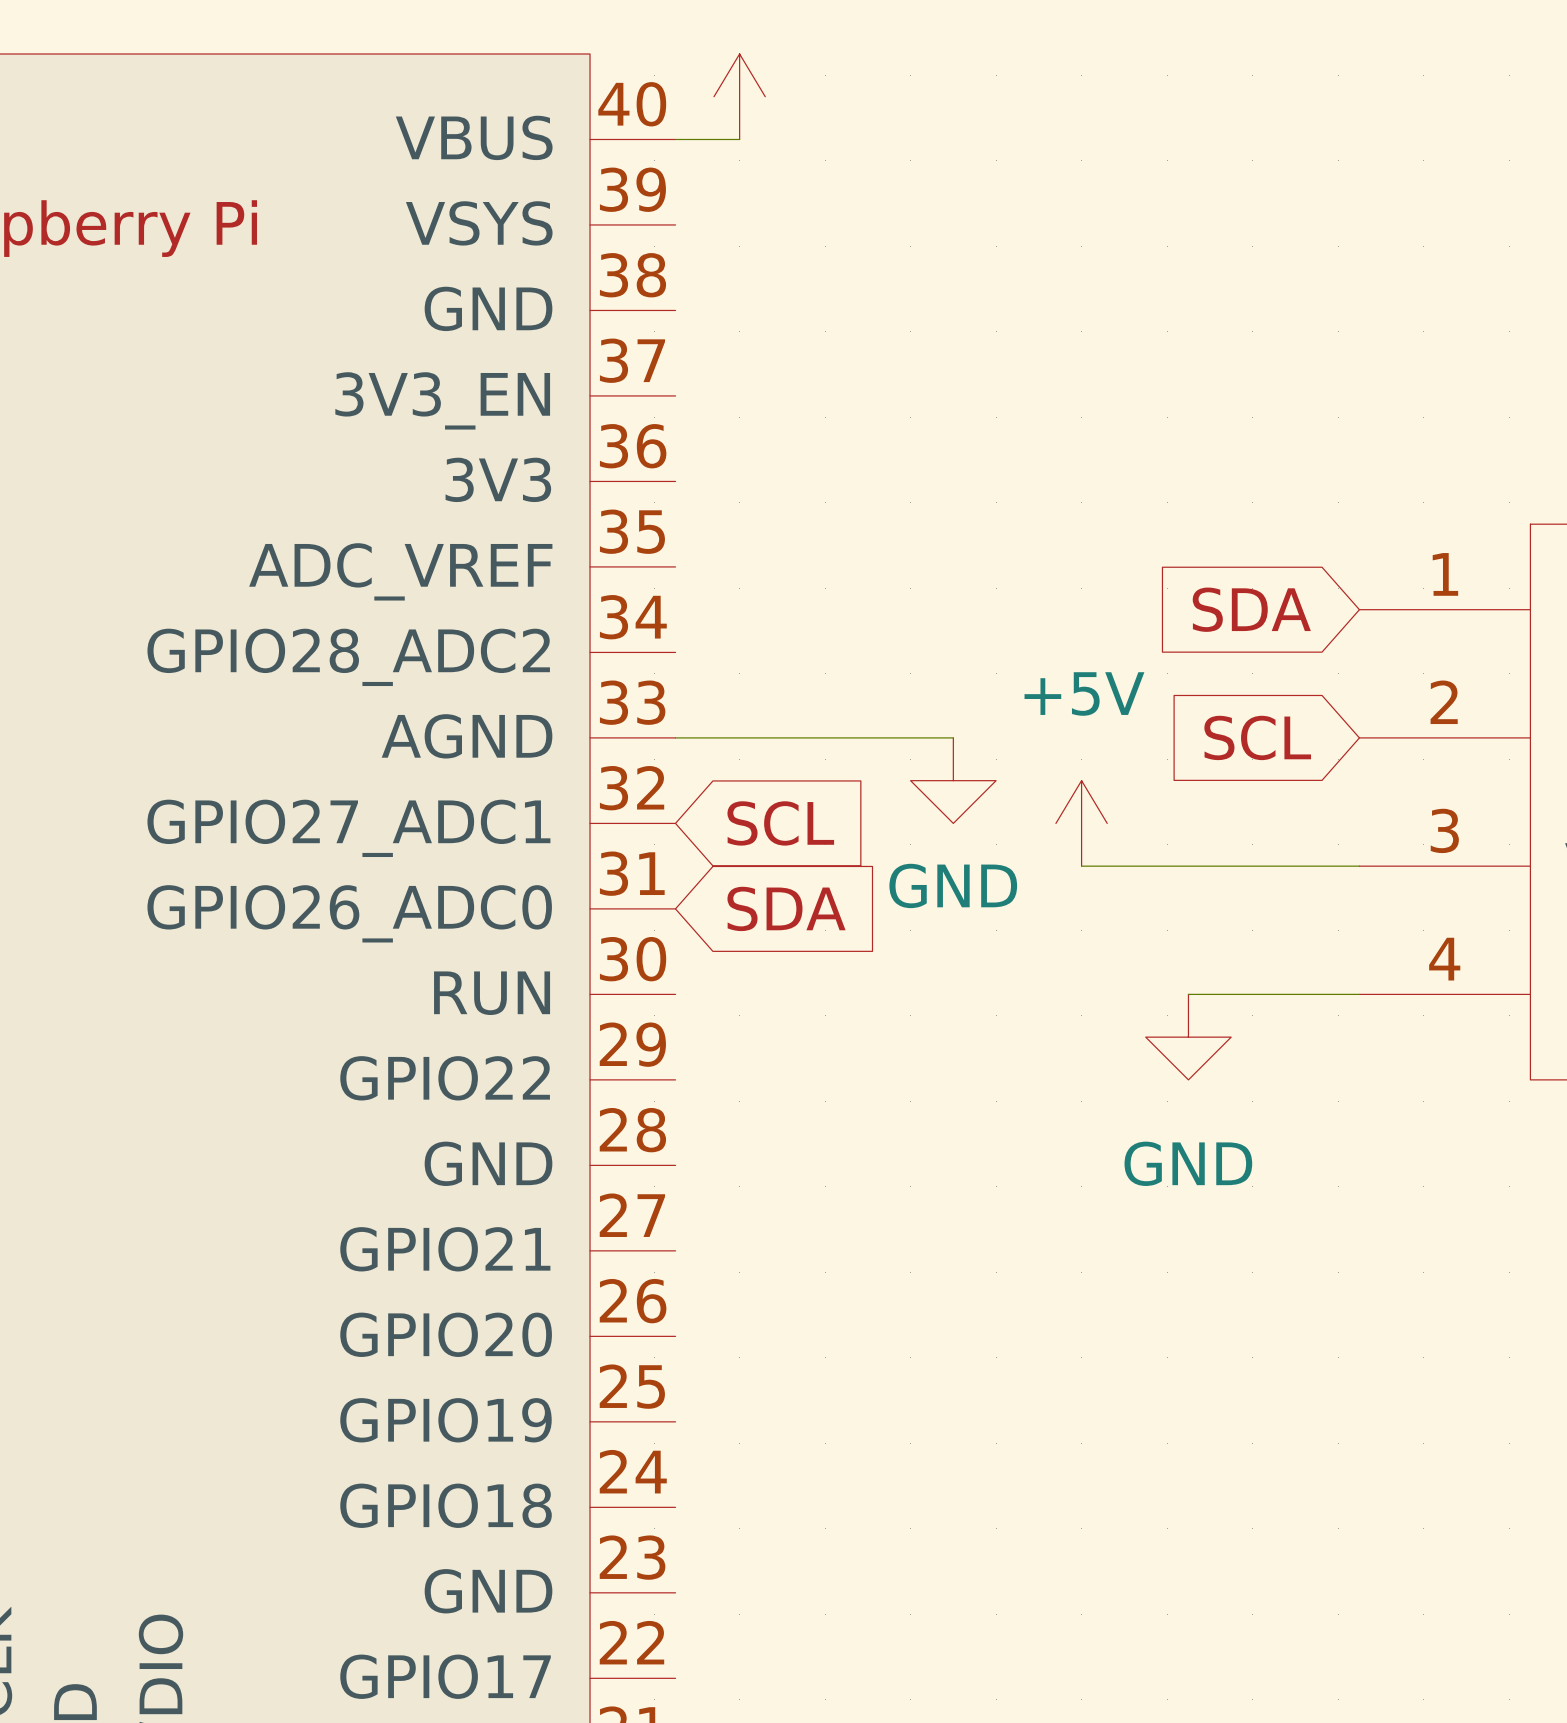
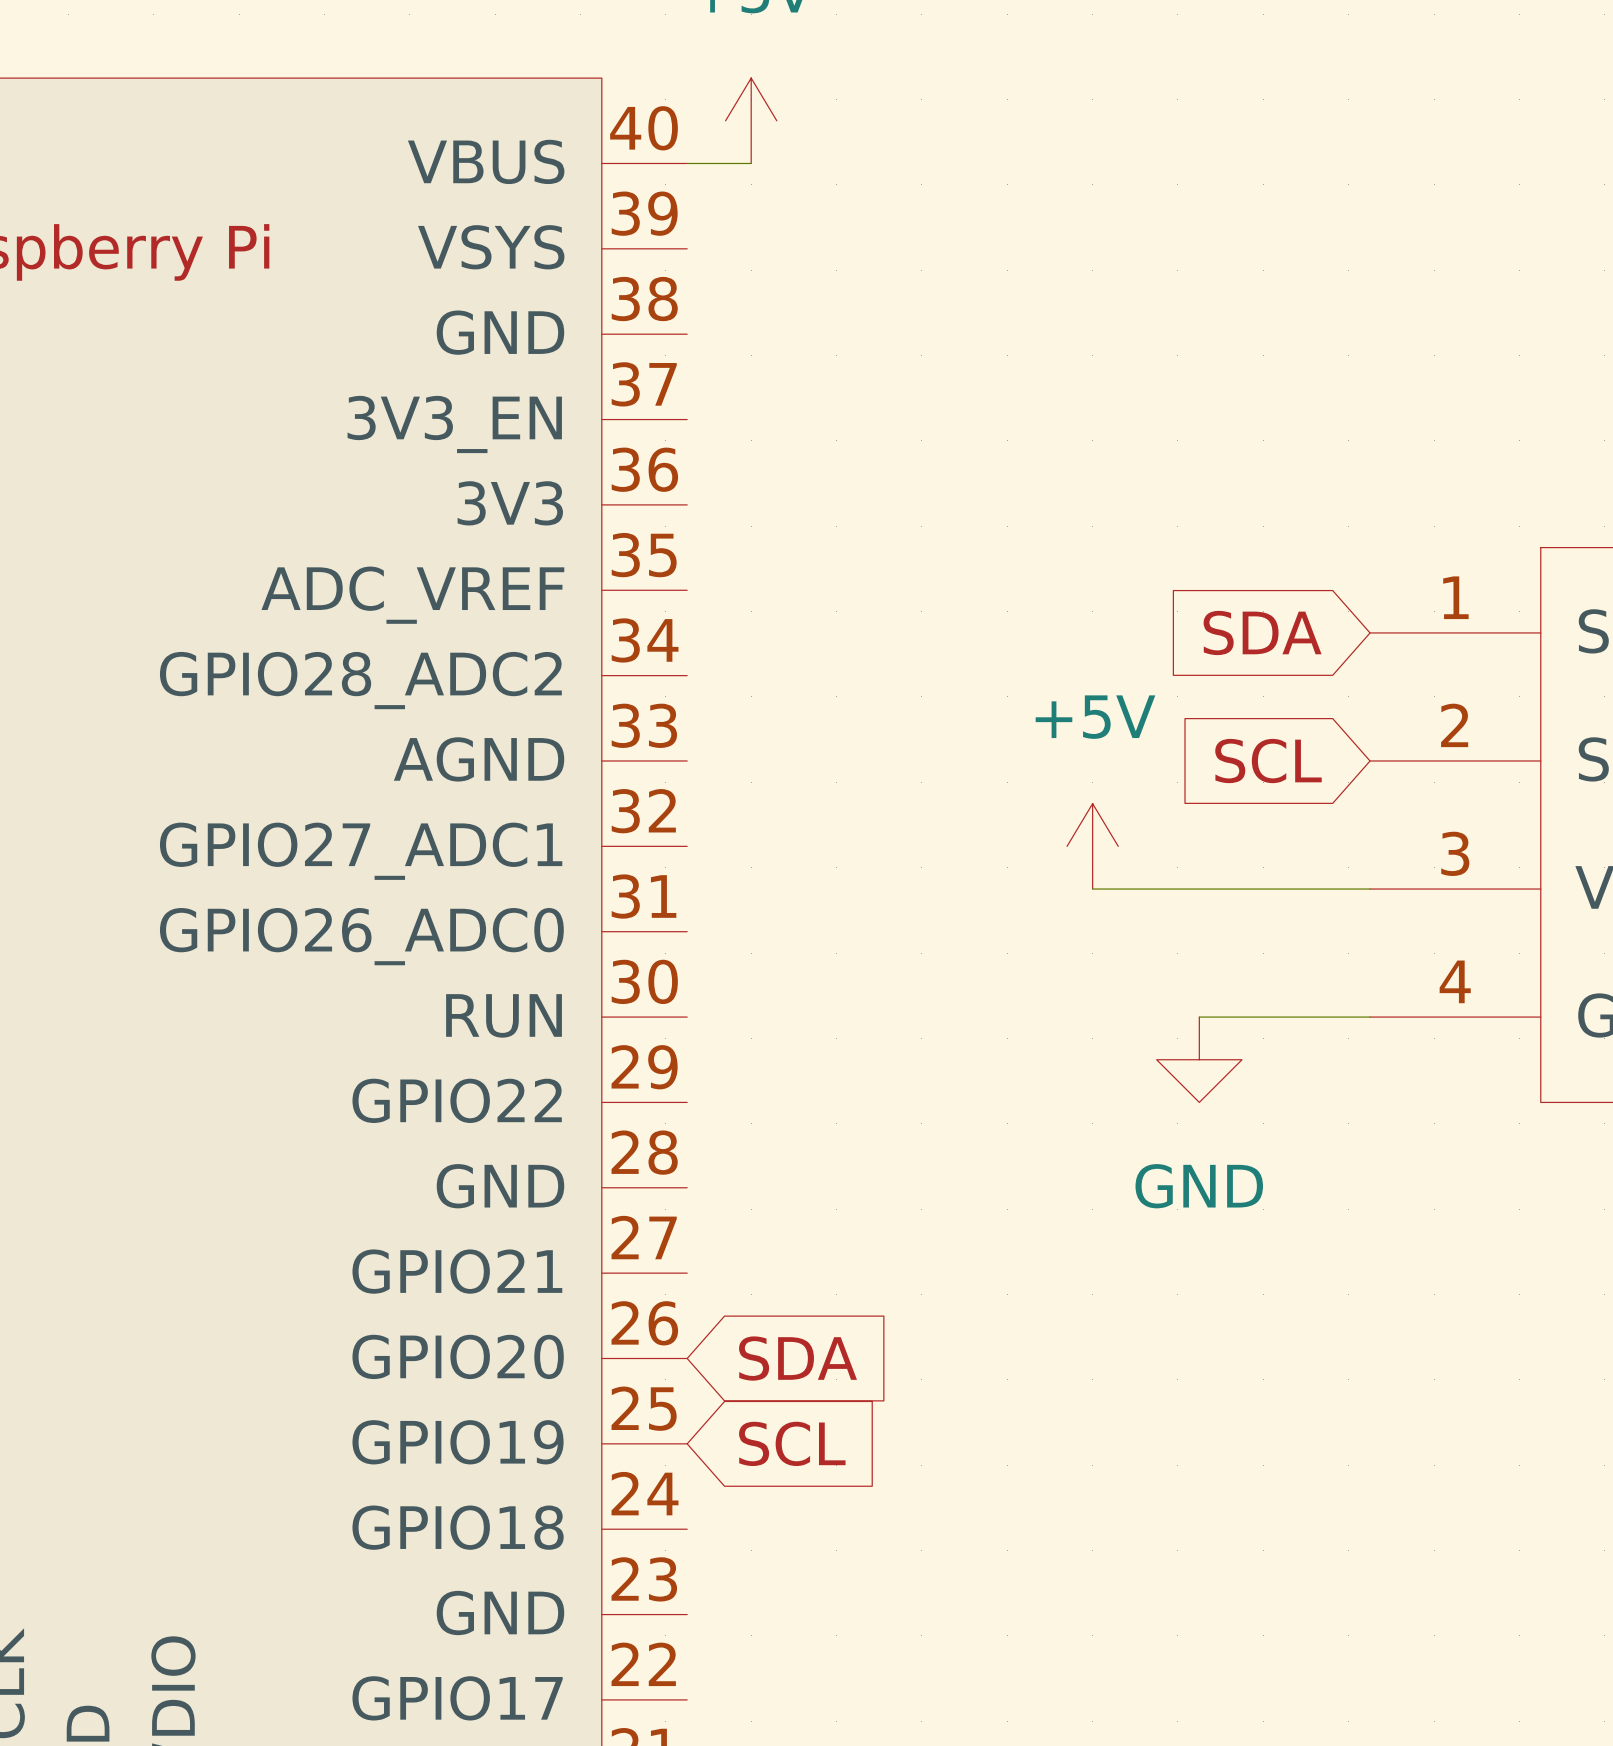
wire: (675, 737) (953, 737) -> none
power symbol: GND (953, 780) -> none
global label position: SCL (780, 823) -> SCL (792, 1443)
global label position: SDA (786, 908) -> SDA (798, 1358)

